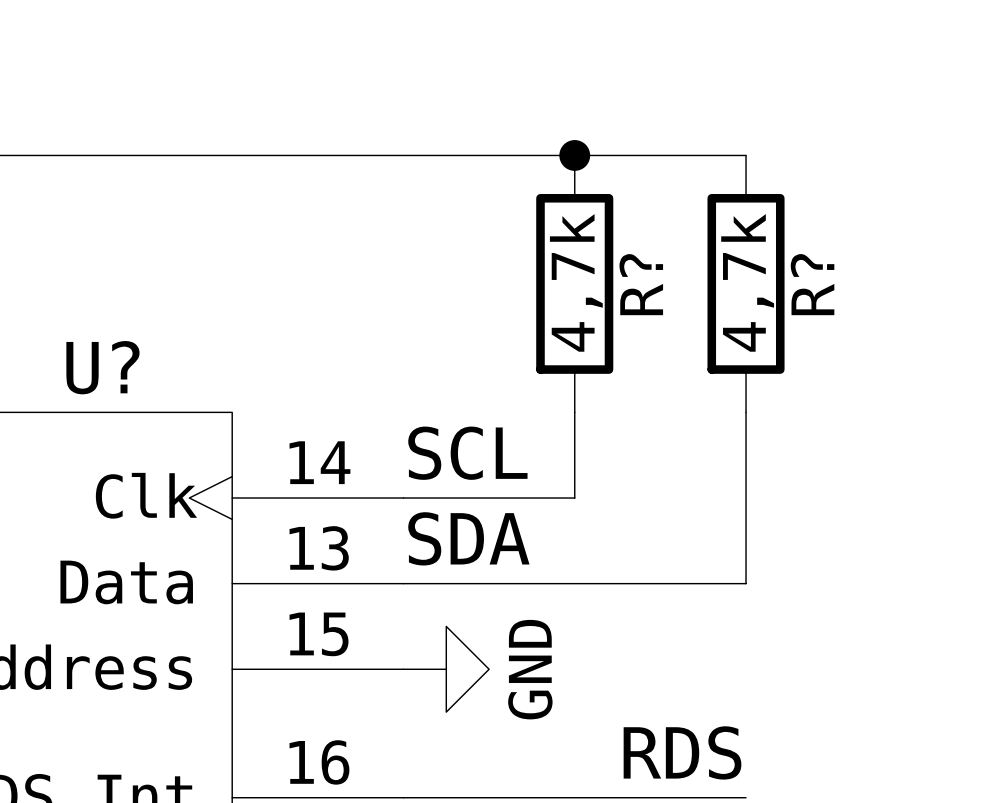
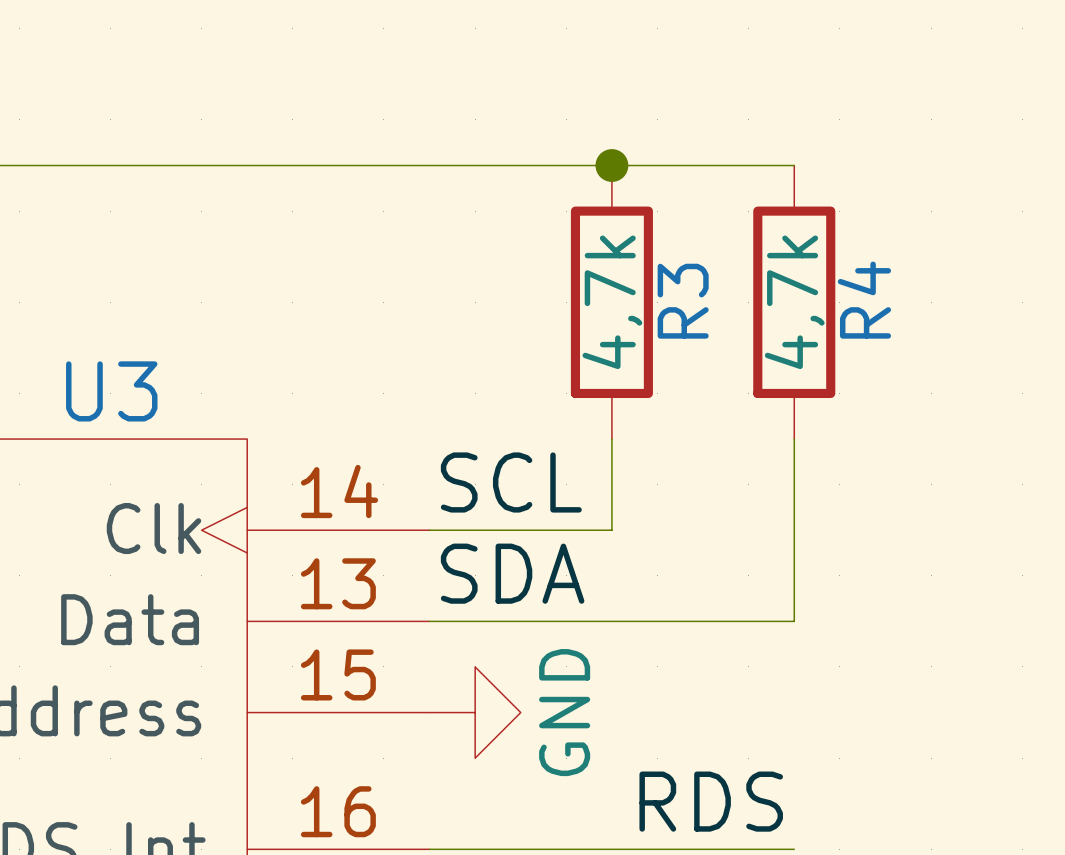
R? name: R? (641, 284) -> R3 (683, 301)
R? name: R? (812, 284) -> R4 (864, 300)
U? name: U? (102, 367) -> U3 (111, 391)

